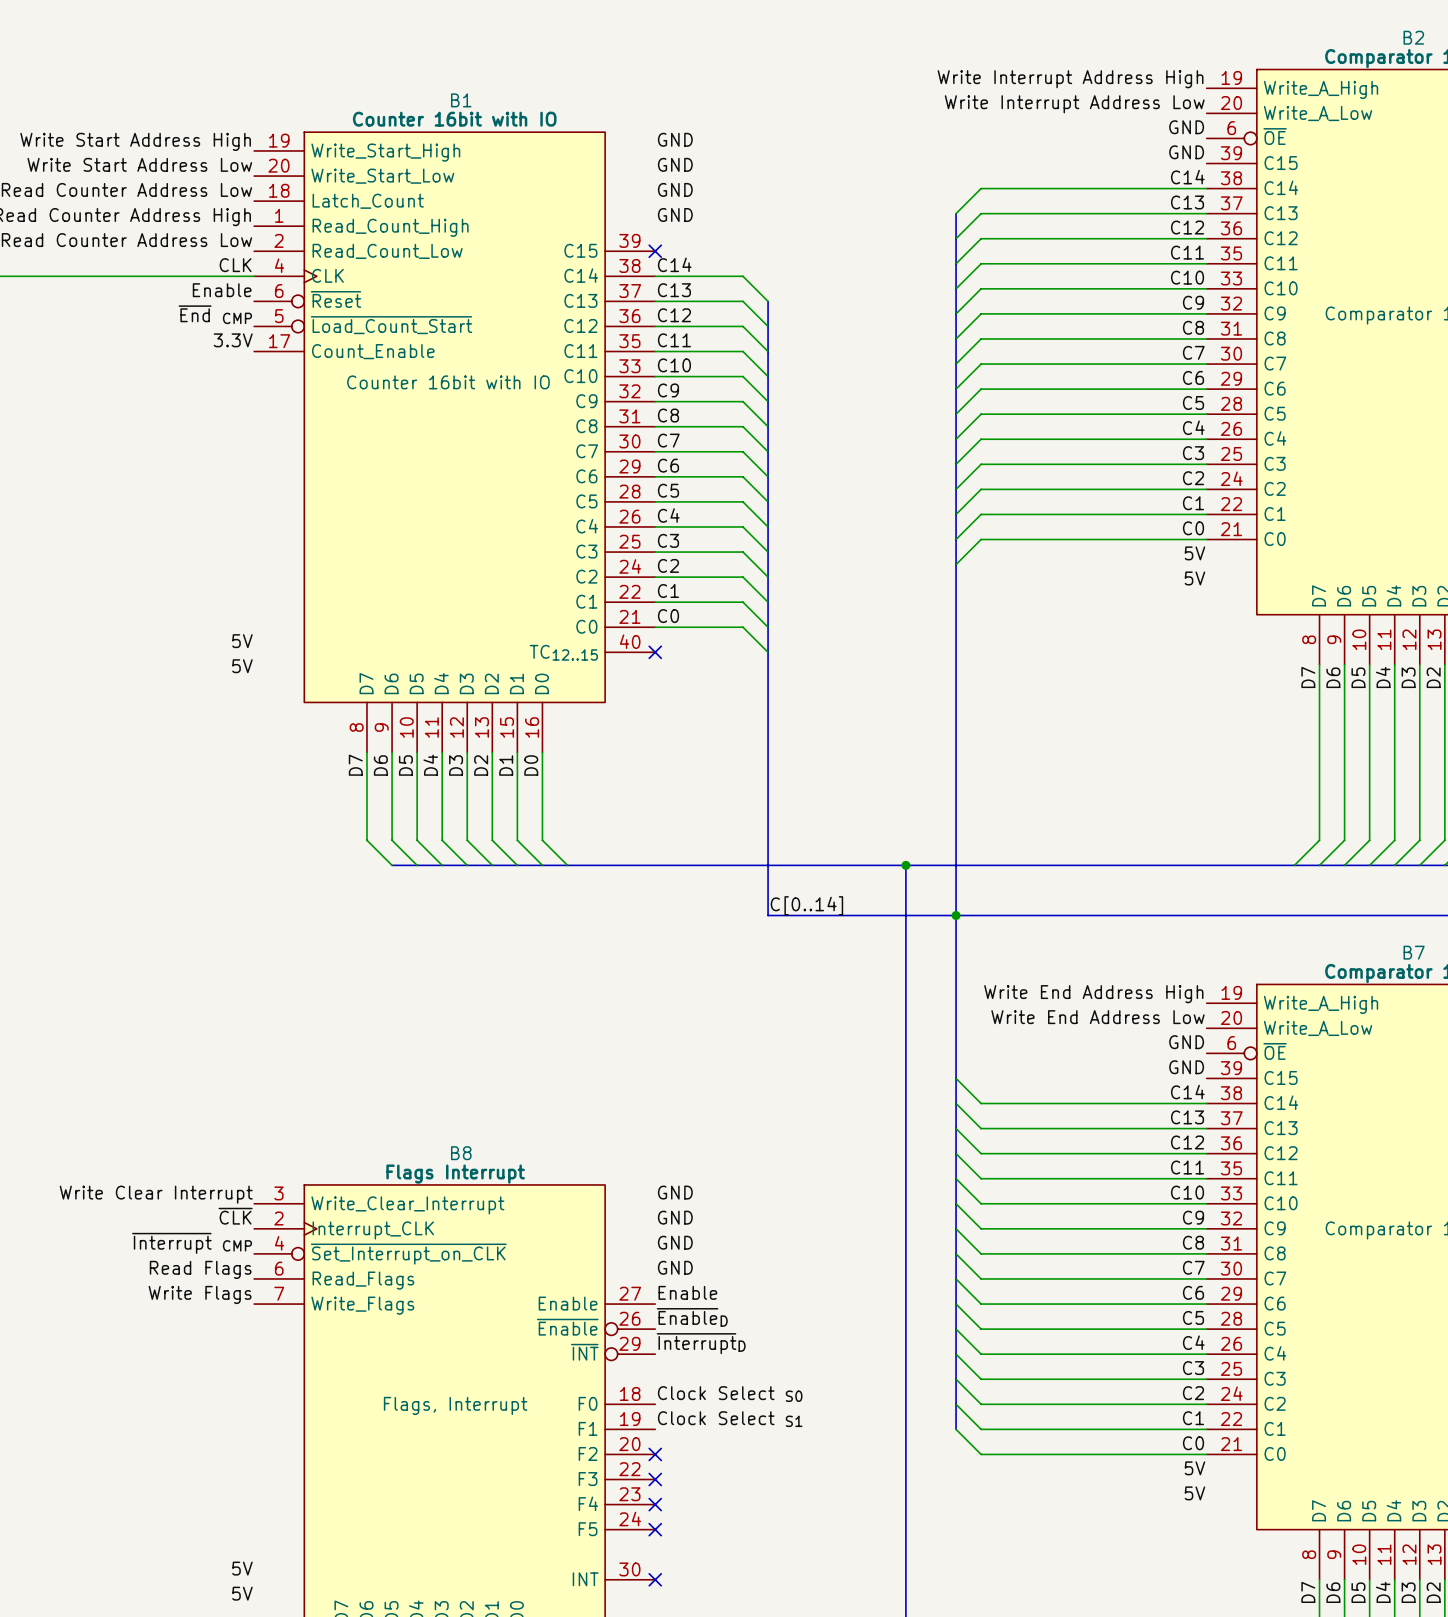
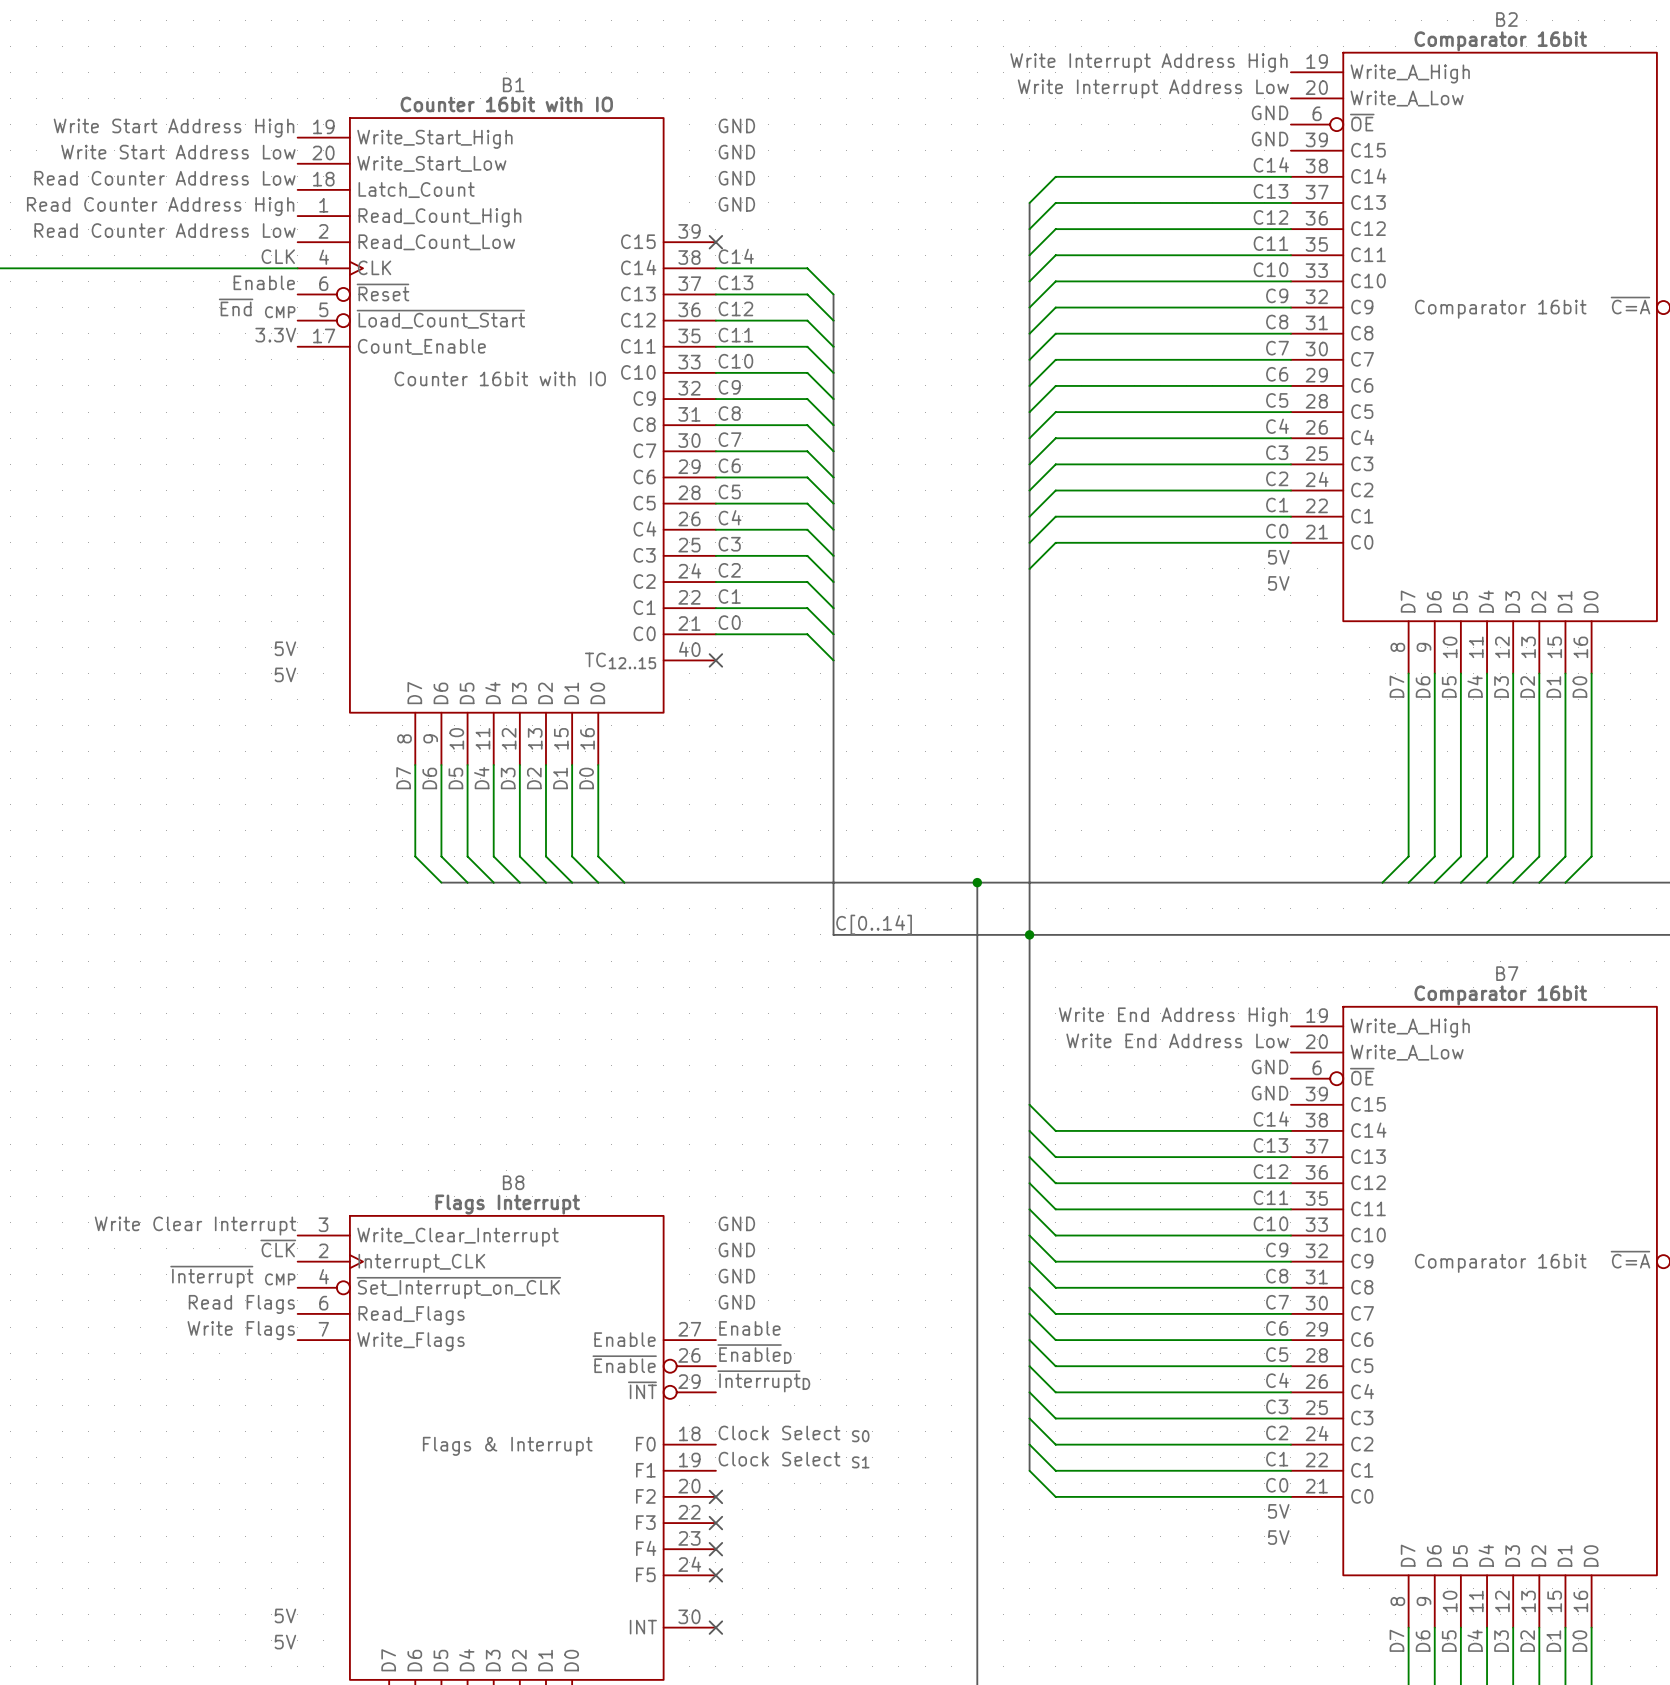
B8 text: Flags, Interrupt (455, 1405) -> Flags & Interrupt (507, 1446)

